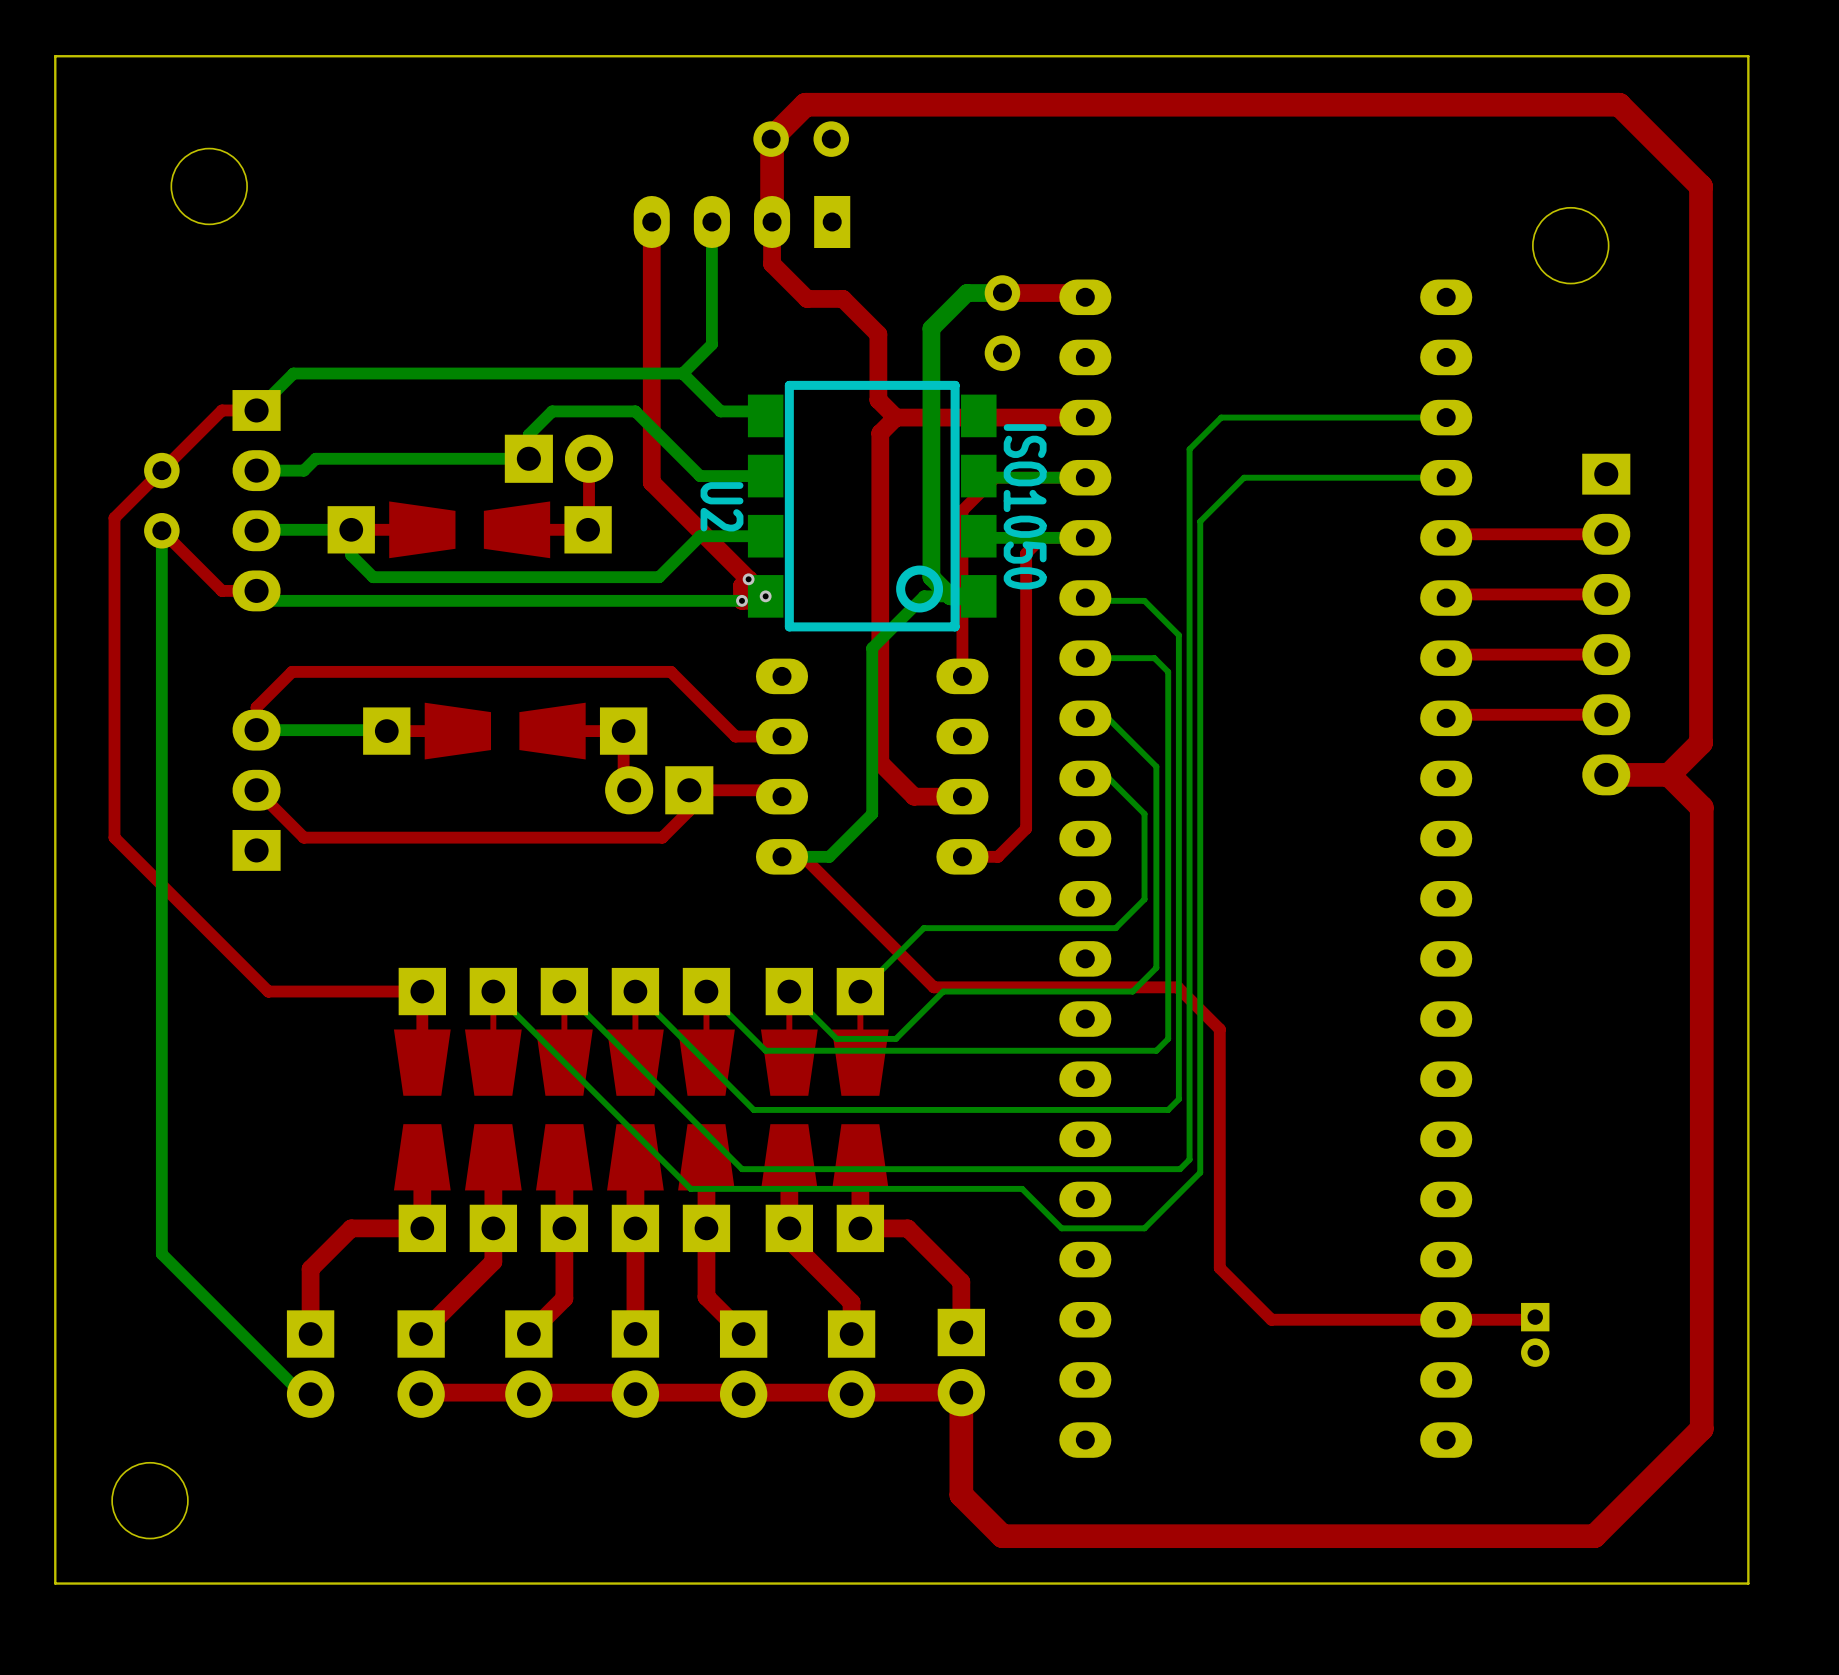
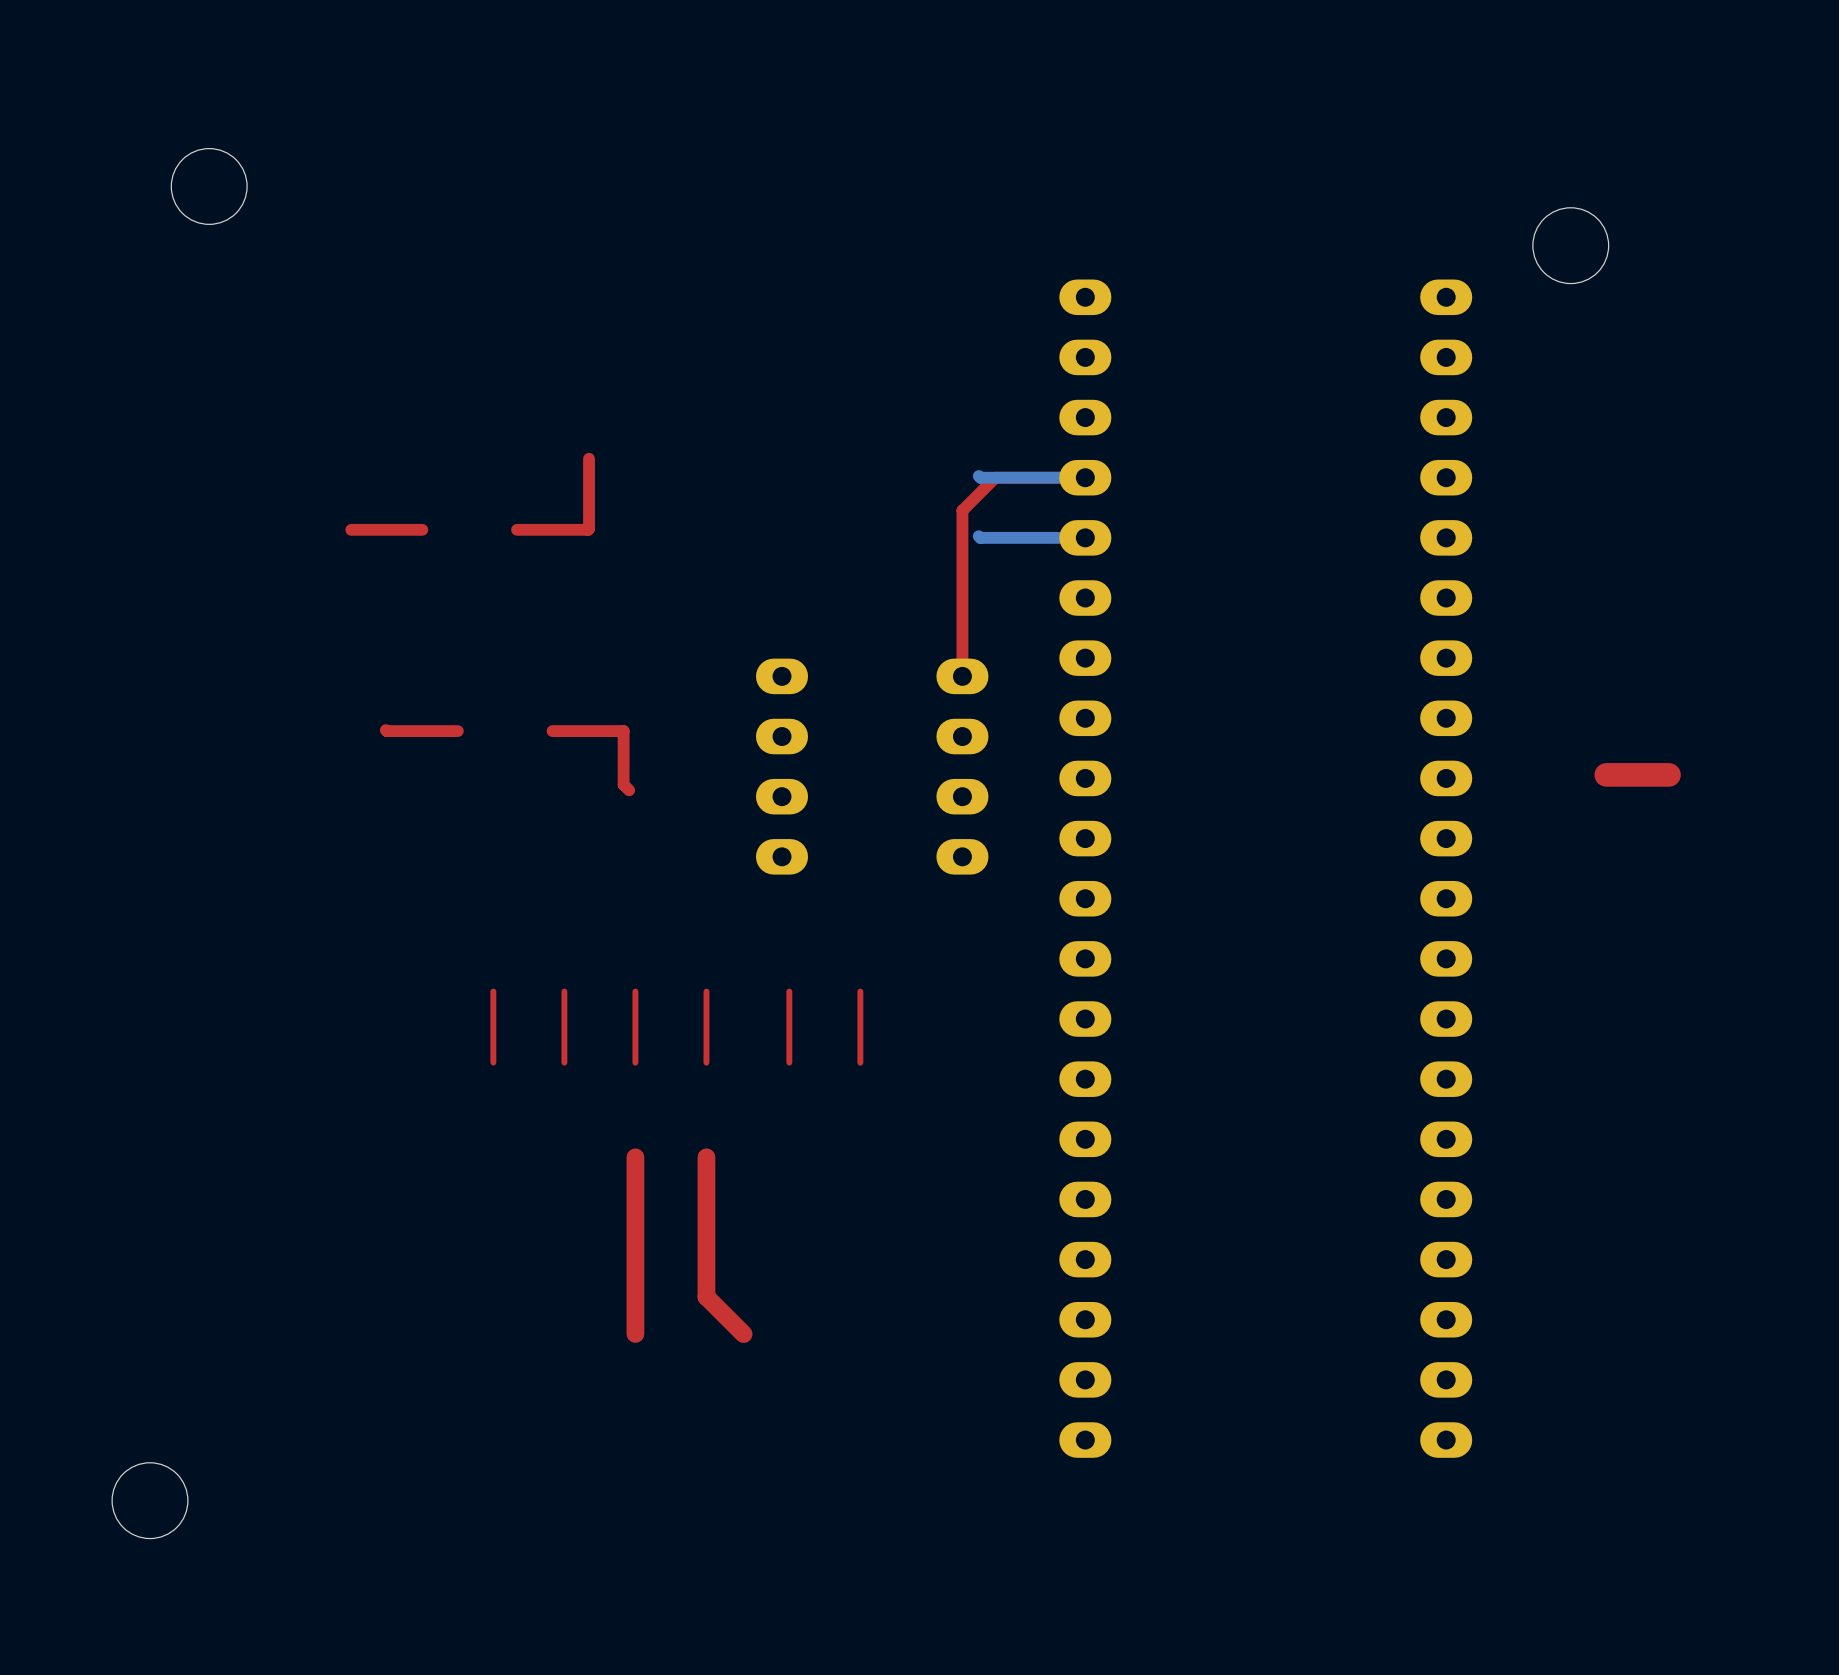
board edge: (1748, 56) (55, 56) (55, 1583) (1748, 1583) (1748, 56) -> none
part: (801, 139) -> none
top track: (651, 221) (651, 482) (765, 596) (761, 600) (741, 600) (741, 585) (748, 579) -> none
bottom track: (711, 221) (711, 344) (682, 373) -> none
part: (741, 221) -> none
top track: (1002, 293) (1081, 293) (1085, 297) -> none
bottom track: (1002, 293) (966, 293) (931, 328) (931, 577) (950, 596) (978, 596) (924, 596) (872, 648) (872, 813) (829, 856) (782, 856) -> none
part: (1002, 323) -> none
bottom track: (682, 373) (293, 373) (256, 410) -> none
bottom track: (682, 373) (720, 411) (761, 411) (765, 415) -> none
top track: (256, 410) (221, 410) (114, 517) (114, 837) (268, 991) (422, 991) (422, 1062) -> none
top track: (895, 417) (878, 400) (878, 334) (843, 298) (807, 298) (772, 263) (771, 139) (805, 104) (1619, 104) (1700, 186) (1700, 742) (1669, 774) (1701, 807) (1701, 1428) (1594, 1536) (1002, 1536) (961, 1495) (961, 1392) (422, 1392) (421, 1394) -> none
top track: (895, 417) (880, 433) (880, 762) (914, 796) (962, 796) -> none
top track: (1085, 417) (895, 417) -> none
bottom track: (1446, 417) (1221, 417) (1189, 449) (1189, 1159) (1180, 1169) (742, 1169) (564, 991) -> none
part: (558, 458) -> none
bottom track: (256, 470) (303, 470) (315, 458) (528, 458) (528, 434) (552, 411) (635, 411) (700, 476) (765, 476) -> none
bottom track: (1446, 477) (1243, 477) (1200, 521) (1200, 1172) (1144, 1228) (1061, 1228) (1022, 1188) (690, 1188) (493, 991) -> none
part: (161, 500) -> none
part: (256, 500) -> none
U2: ISO1050 (872, 506) -> none
part: (469, 529) -> none
top track: (161, 530) (221, 590) (256, 590) -> none
bottom track: (161, 530) (161, 1253) (302, 1394) (310, 1394) -> none
bottom track: (256, 530) (351, 529) (351, 555) (373, 577) (659, 577) (700, 536) (765, 536) -> none
top track: (1606, 534) (1449, 534) (1446, 537) -> none
top track: (1085, 537) (1041, 537) (1026, 553) (1026, 828) (997, 856) (962, 856) -> none
via: (748, 579) -> none
bottom track: (256, 590) (266, 600) (741, 600) -> none
top track: (1606, 594) (1449, 594) (1446, 598) -> none
via: (765, 596) -> none
bottom track: (1085, 598) (1088, 600) (1144, 600) (1178, 635) (1178, 1099) (1168, 1109) (753, 1109) (635, 991) -> none
via: (741, 600) -> none
part: (1606, 624) -> none
top track: (1606, 654) (1449, 654) (1446, 658) -> none
bottom track: (1085, 658) (1154, 658) (1168, 671) (1168, 1038) (1156, 1050) (765, 1050) (706, 991) -> none
top track: (1606, 714) (1449, 714) (1446, 718) -> none
bottom track: (1085, 718) (1108, 718) (1156, 766) (1156, 967) (1132, 991) (943, 991) (895, 1038) (836, 1038) (789, 991) -> none
top track: (256, 730) (256, 707) (292, 671) (670, 671) (735, 736) (782, 736) -> none
bottom track: (256, 730) (386, 731) -> none
part: (505, 731) -> none
bottom track: (1085, 778) (1109, 778) (1144, 813) (1144, 899) (1115, 928) (923, 928) (860, 991) -> none
top track: (256, 790) (303, 837) (662, 837) (689, 810) (689, 790) (775, 790) (782, 796) -> none
part: (256, 790) -> none
part: (659, 790) -> none
top track: (782, 856) (803, 856) (933, 987) (1177, 987) (1219, 1029) (1219, 1268) (1271, 1319) (1532, 1319) (1535, 1317) -> none
part: (422, 1109) -> none
part: (493, 1109) -> none
part: (564, 1109) -> none
part: (706, 1109) -> none
part: (789, 1109) -> none
part: (635, 1110) -> none
part: (860, 1110) -> none
top track: (422, 1157) (422, 1228) (351, 1228) (310, 1269) (310, 1334) -> none
top track: (493, 1157) (493, 1261) (421, 1334) -> none
top track: (564, 1157) (564, 1298) (528, 1334) -> none
top track: (789, 1157) (789, 1240) (851, 1302) (851, 1334) -> none
top track: (860, 1157) (860, 1228) (907, 1228) (961, 1281) (961, 1332) -> none
part: (1535, 1334) -> none
part: (961, 1362) -> none
part: (310, 1364) -> none
part: (421, 1364) -> none
part: (528, 1364) -> none
part: (635, 1364) -> none
part: (743, 1364) -> none
part: (851, 1364) -> none

